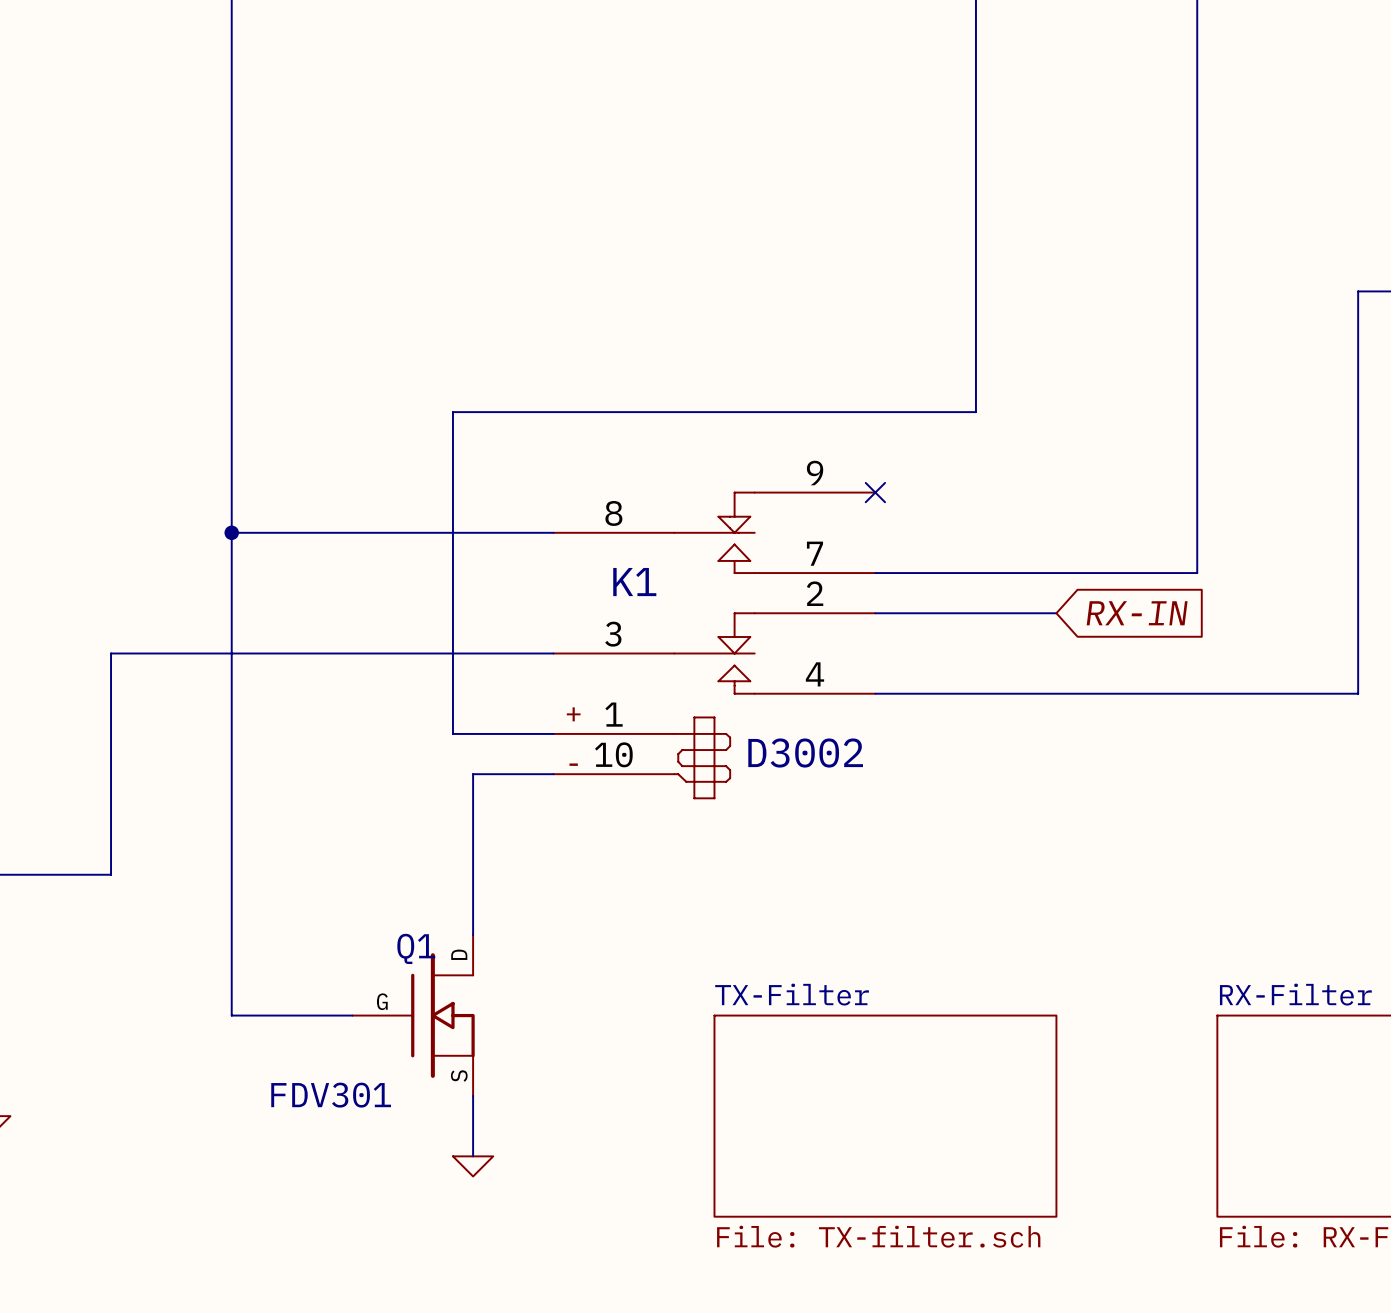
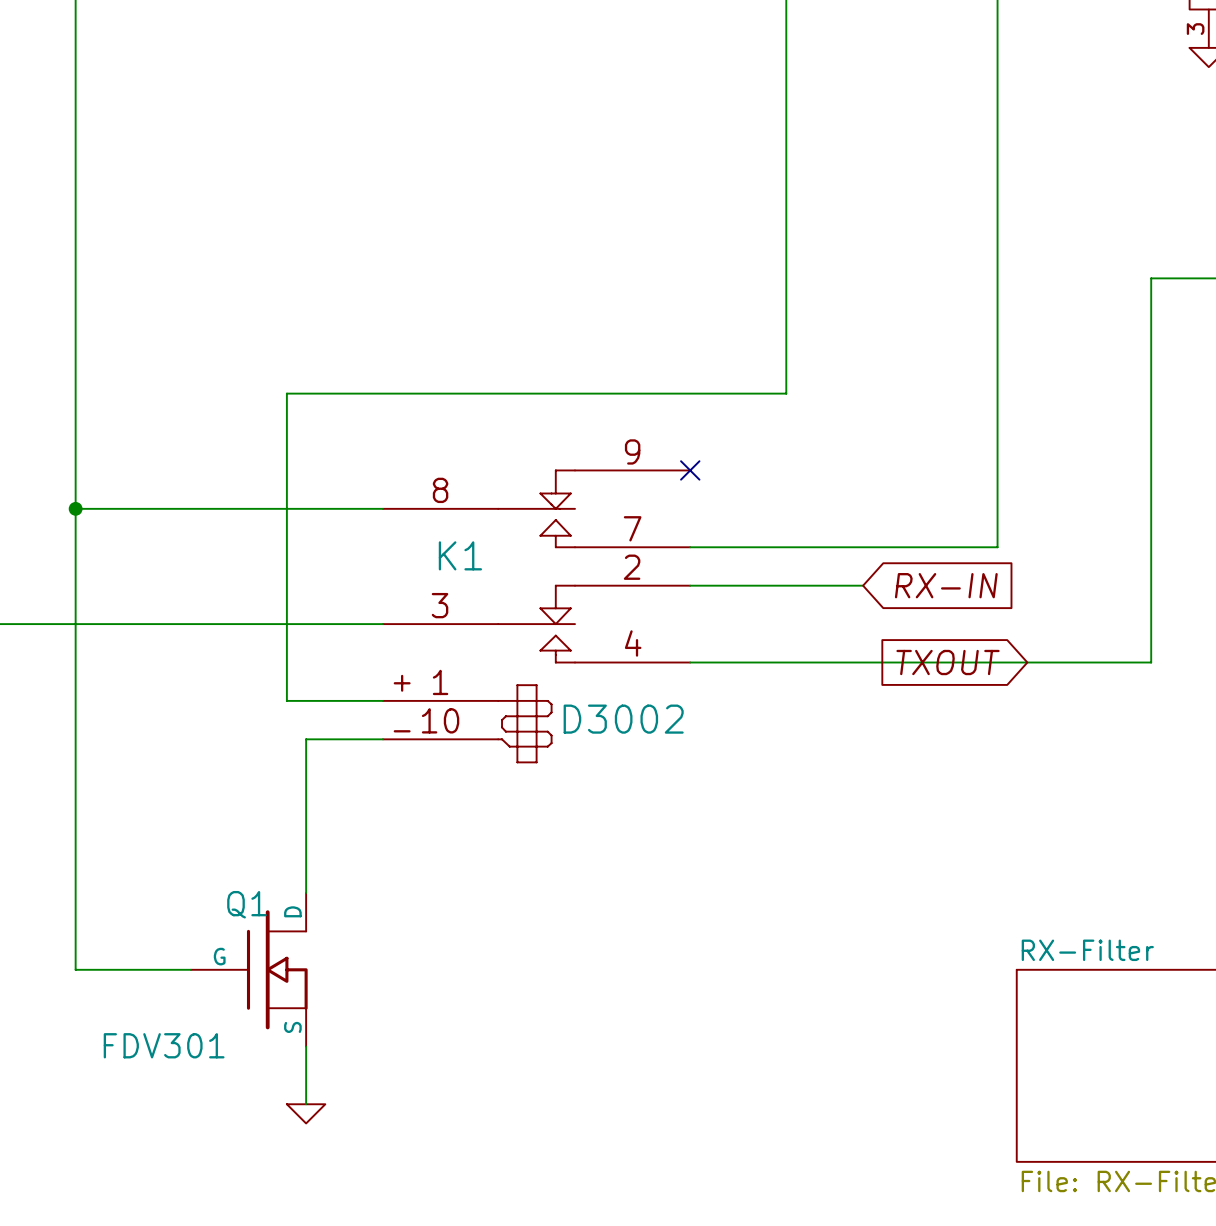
global label: none -> TXOUT (948, 662)
sheet TX-Filter: File: TX-filter.sch (885, 1116) -> none

